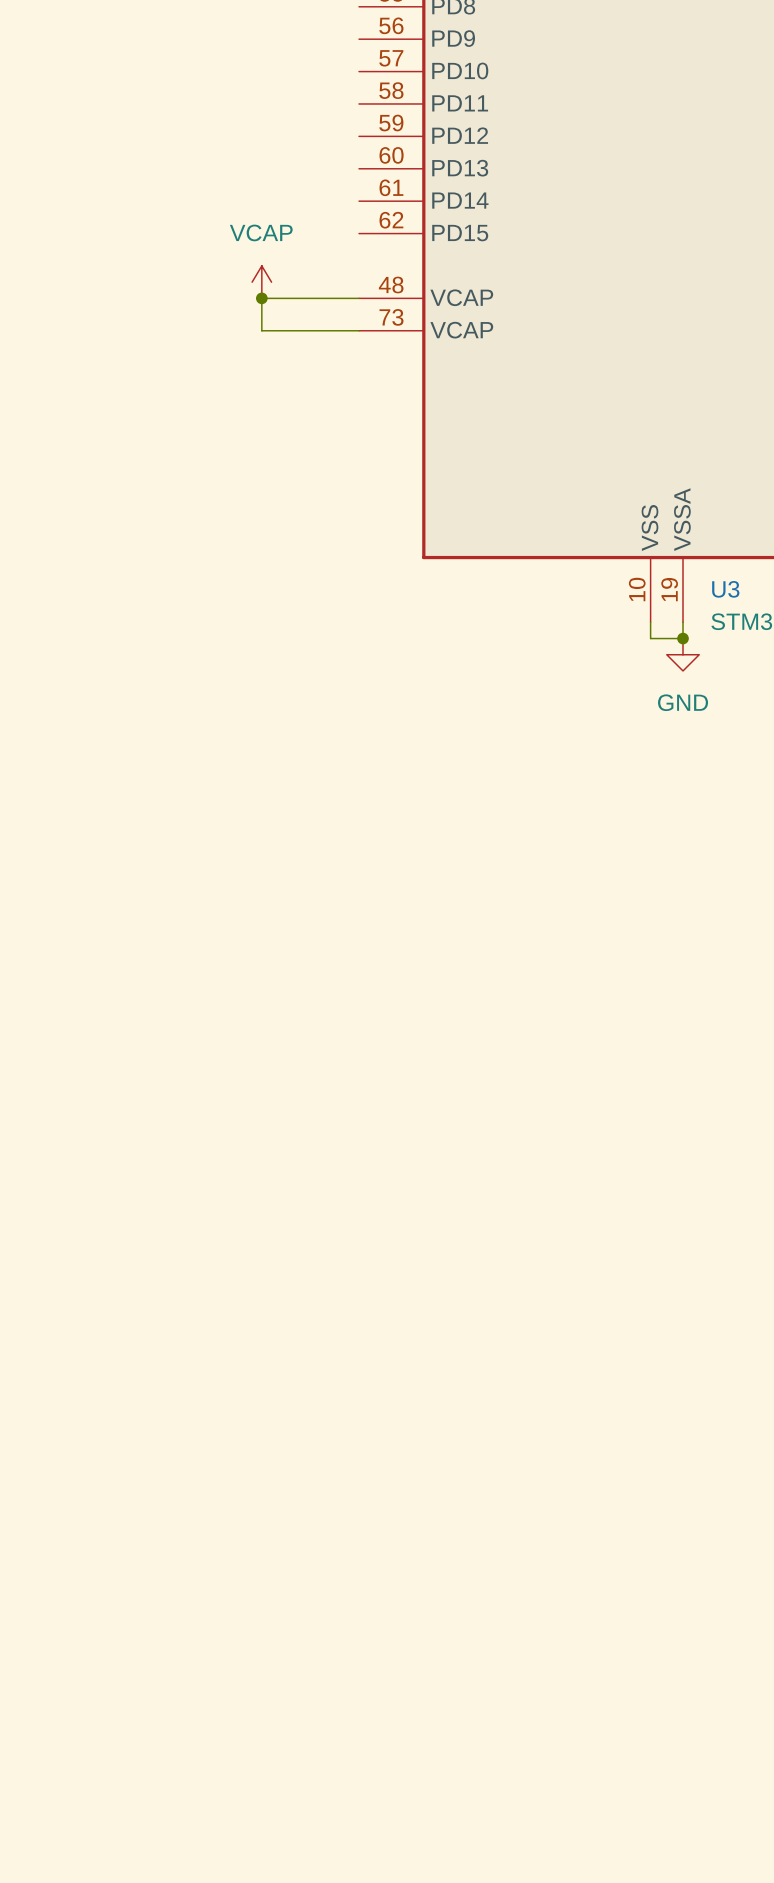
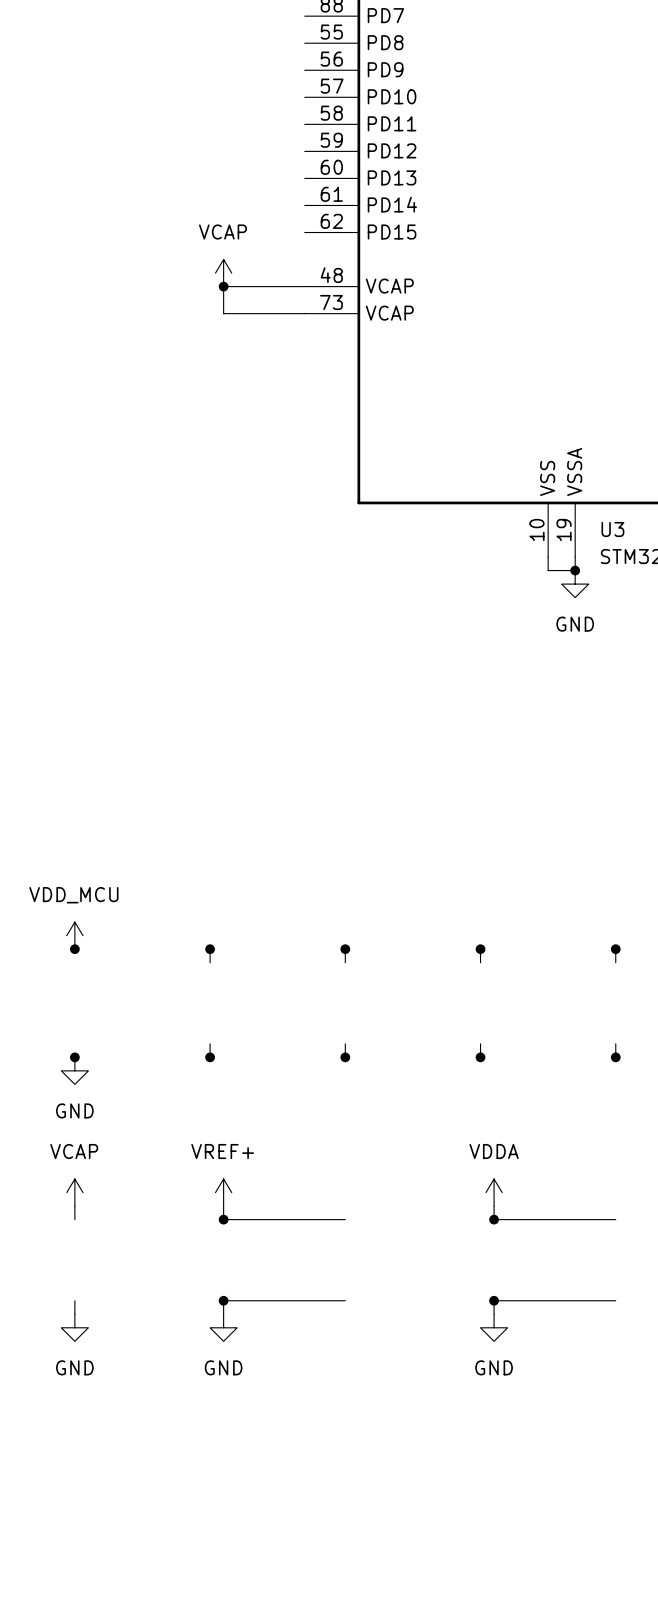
power symbol: none -> VDD_MCU (74, 935)
junction: none -> (74, 949)
wire: none -> (210, 949) (210, 962)
junction: none -> (210, 949)
wire: none -> (345, 949) (345, 962)
junction: none -> (345, 949)
wire: none -> (480, 949) (480, 962)
junction: none -> (480, 949)
wire: none -> (615, 949) (615, 962)
junction: none -> (615, 949)
wire: none -> (210, 1043) (210, 1057)
wire: none -> (345, 1043) (345, 1057)
wire: none -> (480, 1043) (480, 1057)
wire: none -> (615, 1043) (615, 1057)
junction: none -> (74, 1057)
junction: none -> (210, 1057)
junction: none -> (345, 1057)
junction: none -> (480, 1057)
junction: none -> (615, 1057)
power symbol: none -> GND (74, 1070)
power symbol: none -> VCAP (74, 1192)
power symbol: none -> VREF+ (223, 1192)
power symbol: none -> VDDA (494, 1192)
wire: none -> (74, 1206) (74, 1219)
wire: none -> (223, 1206) (223, 1219) (345, 1219)
wire: none -> (494, 1206) (494, 1219) (615, 1219)
junction: none -> (223, 1219)
junction: none -> (494, 1219)
wire: none -> (74, 1300) (74, 1314)
junction: none -> (223, 1300)
wire: none -> (345, 1300) (223, 1300) (223, 1314)
junction: none -> (494, 1300)
wire: none -> (615, 1300) (494, 1300) (494, 1314)
power symbol: none -> GND (74, 1327)
power symbol: none -> GND (223, 1327)
power symbol: none -> GND (494, 1327)

